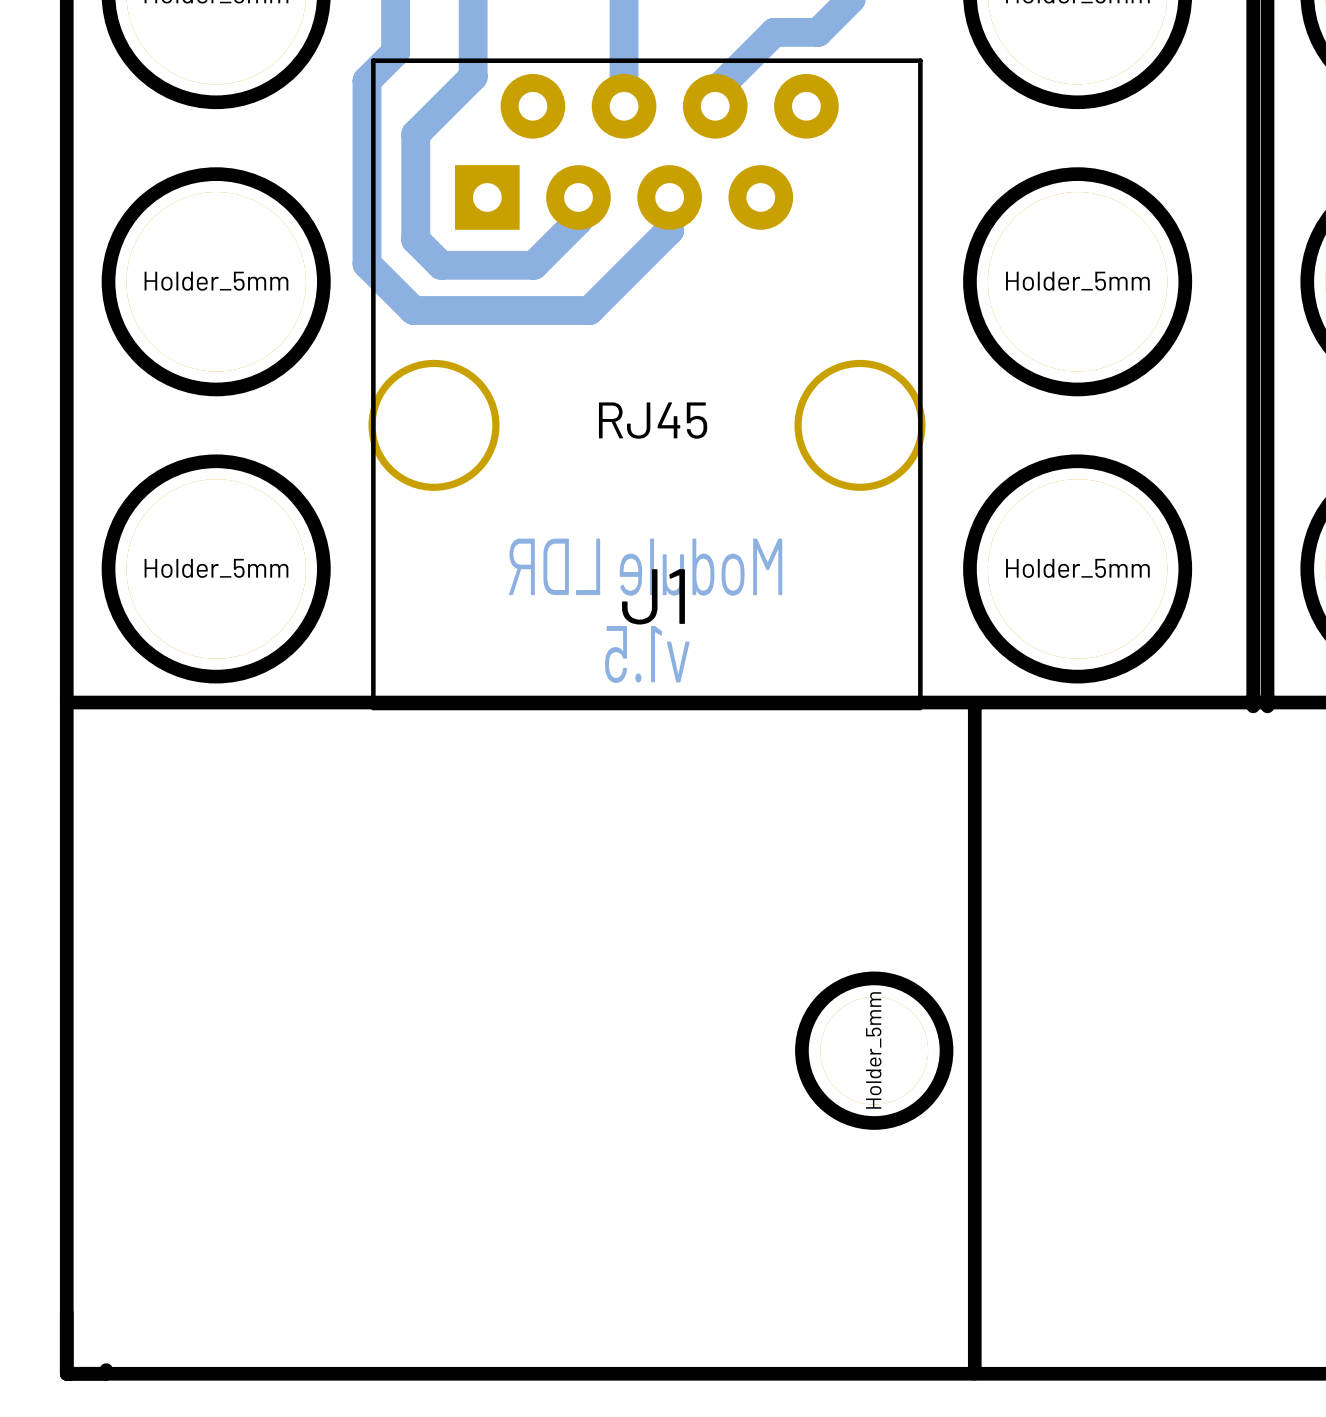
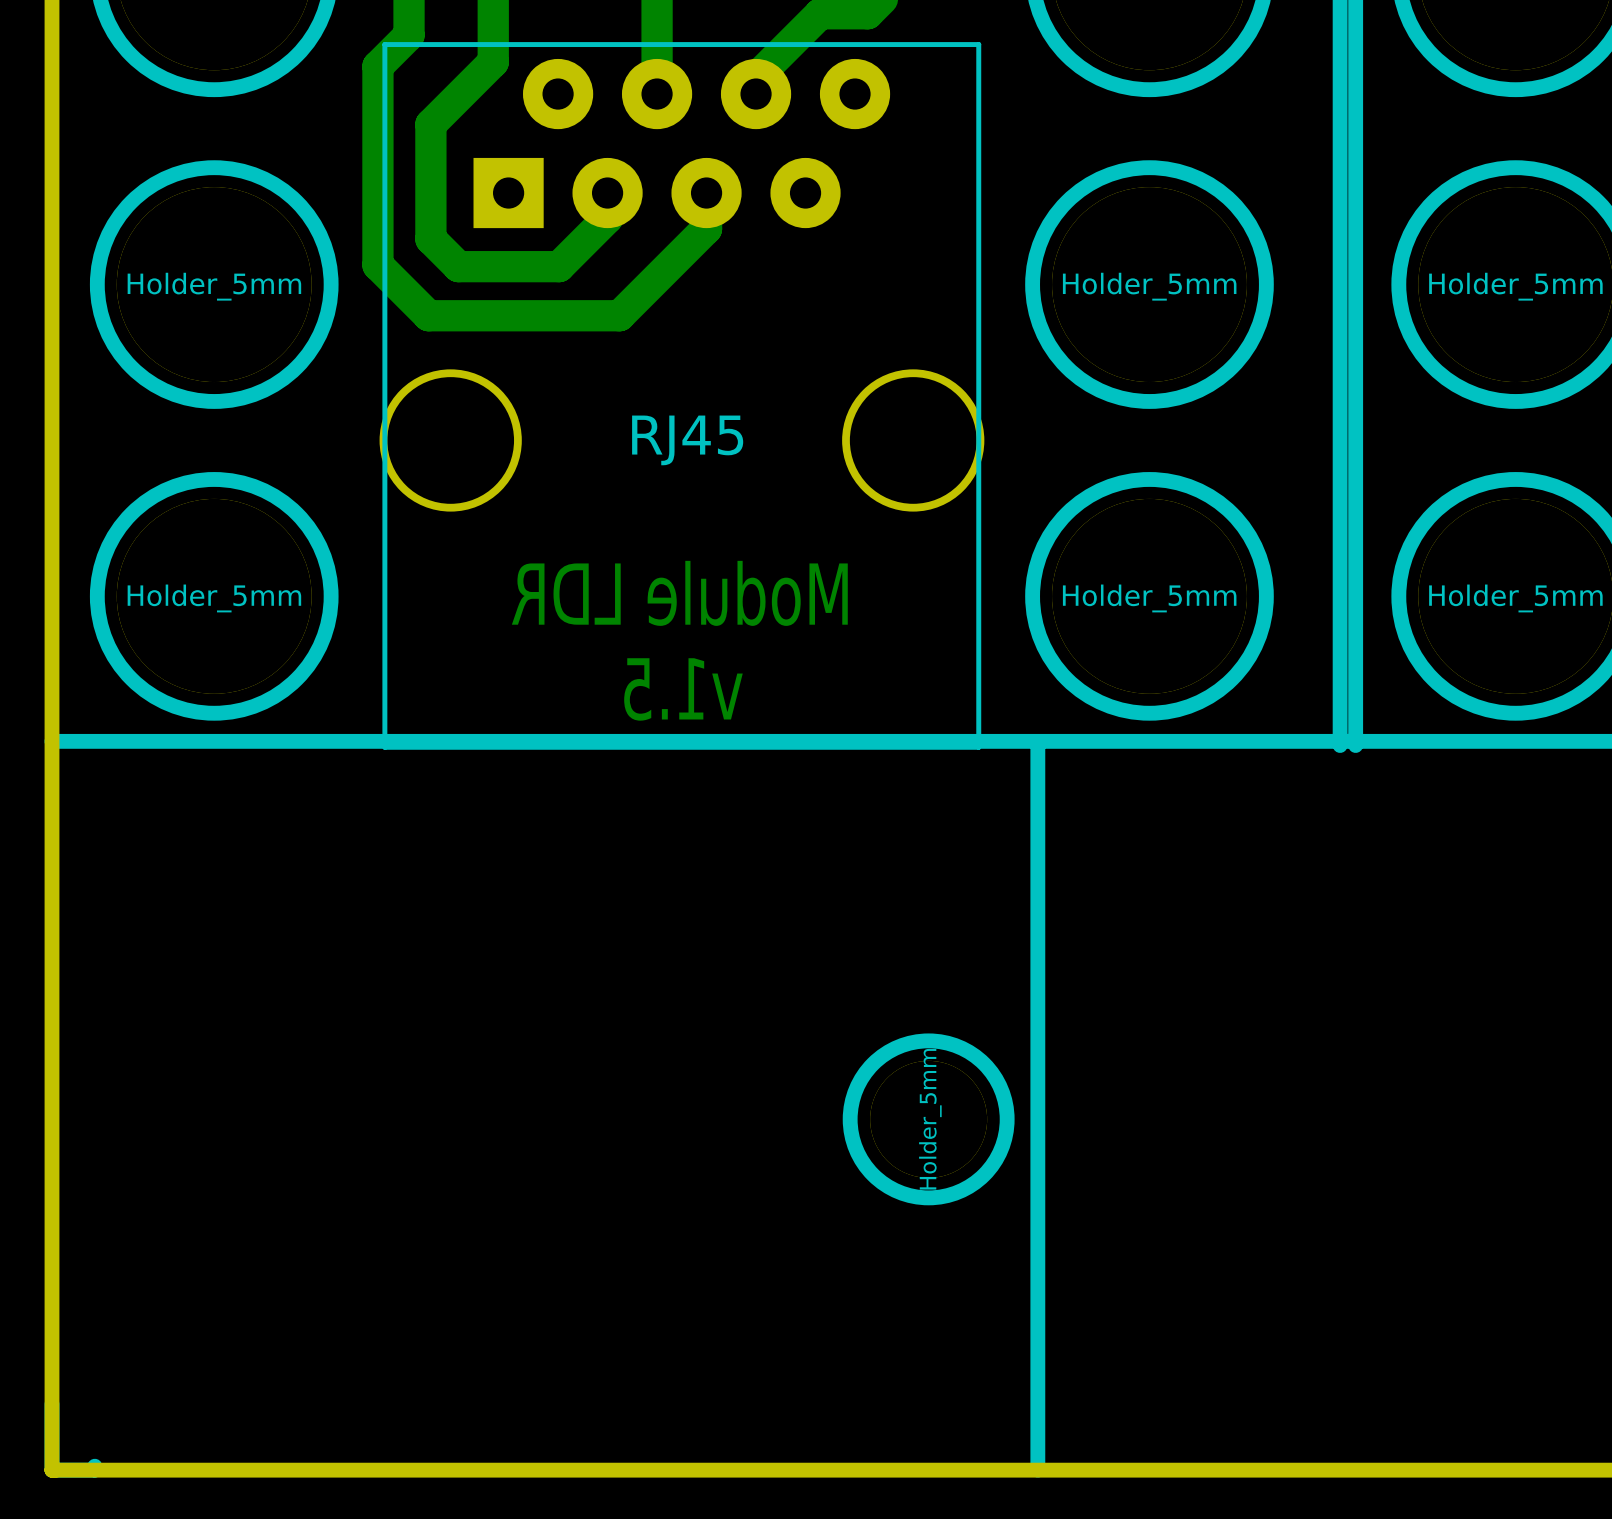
J1 name: J1 (653, 596) -> none

